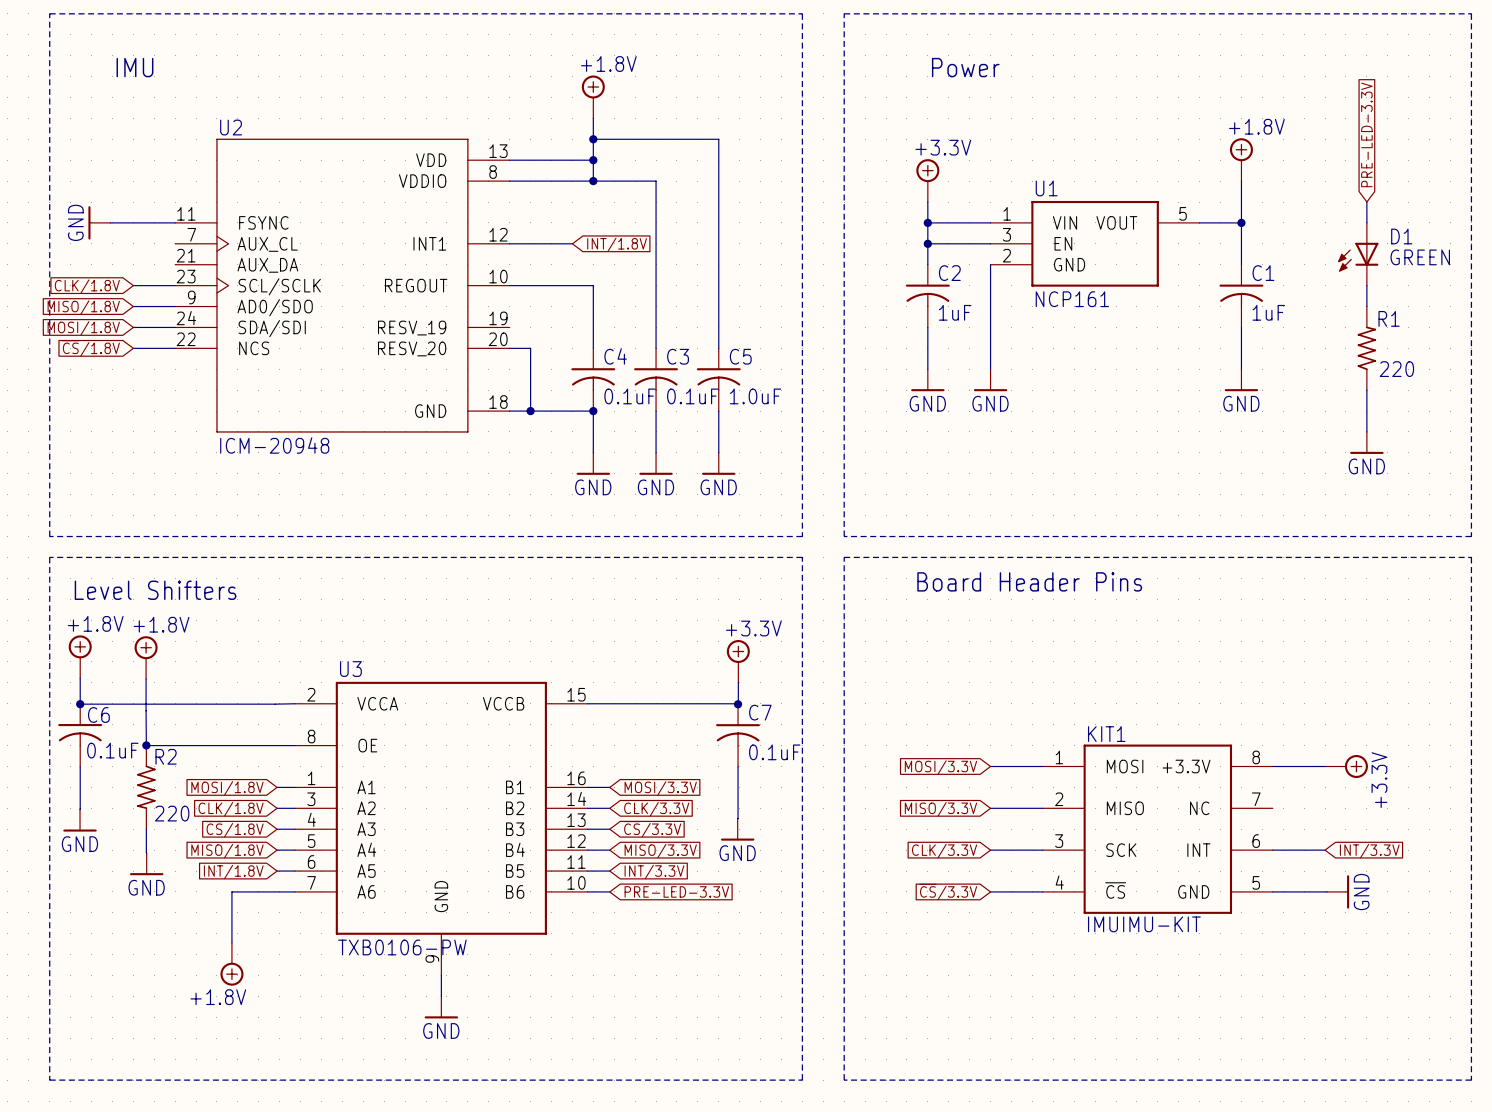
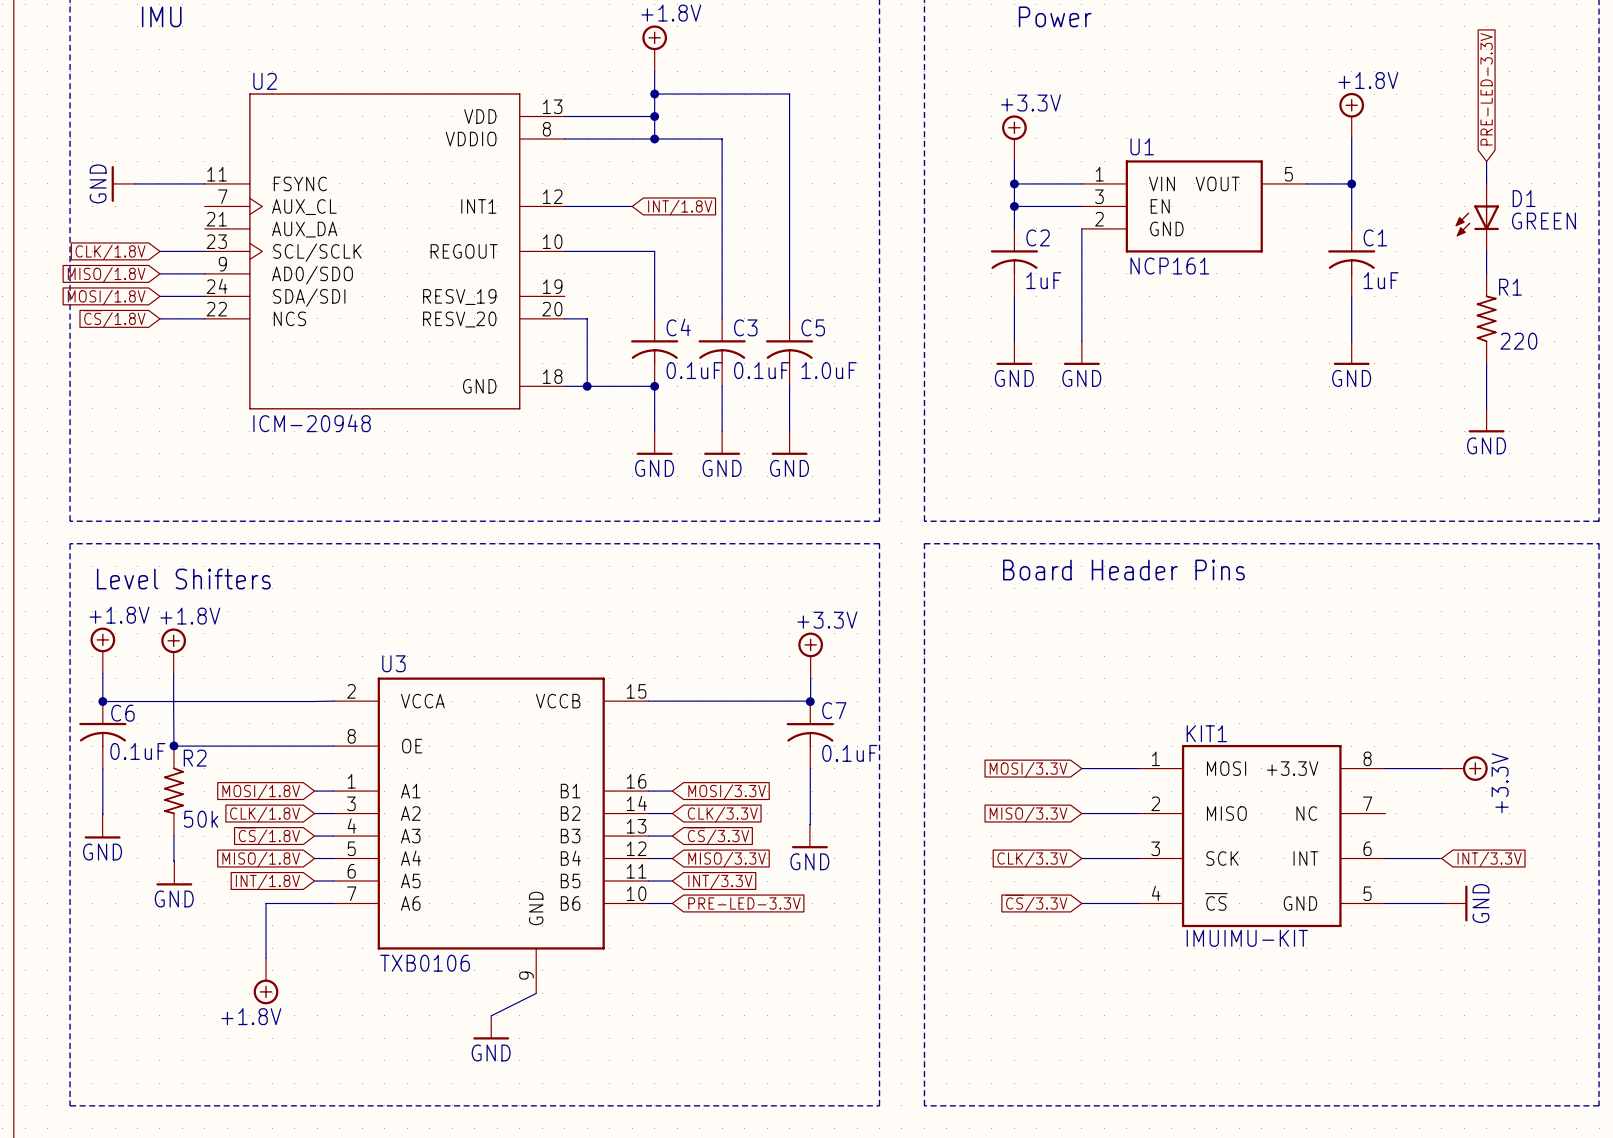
U3 symbol: [295, 681, 588, 976] -> [333, 677, 649, 994]
R2 value: 220 (172, 813) -> 50k (201, 819)
U3 value: TXB0106-PW (402, 947) -> TXB0106 (425, 963)
wire: (441, 975) (441, 996) -> (536, 993) (491, 1015)

